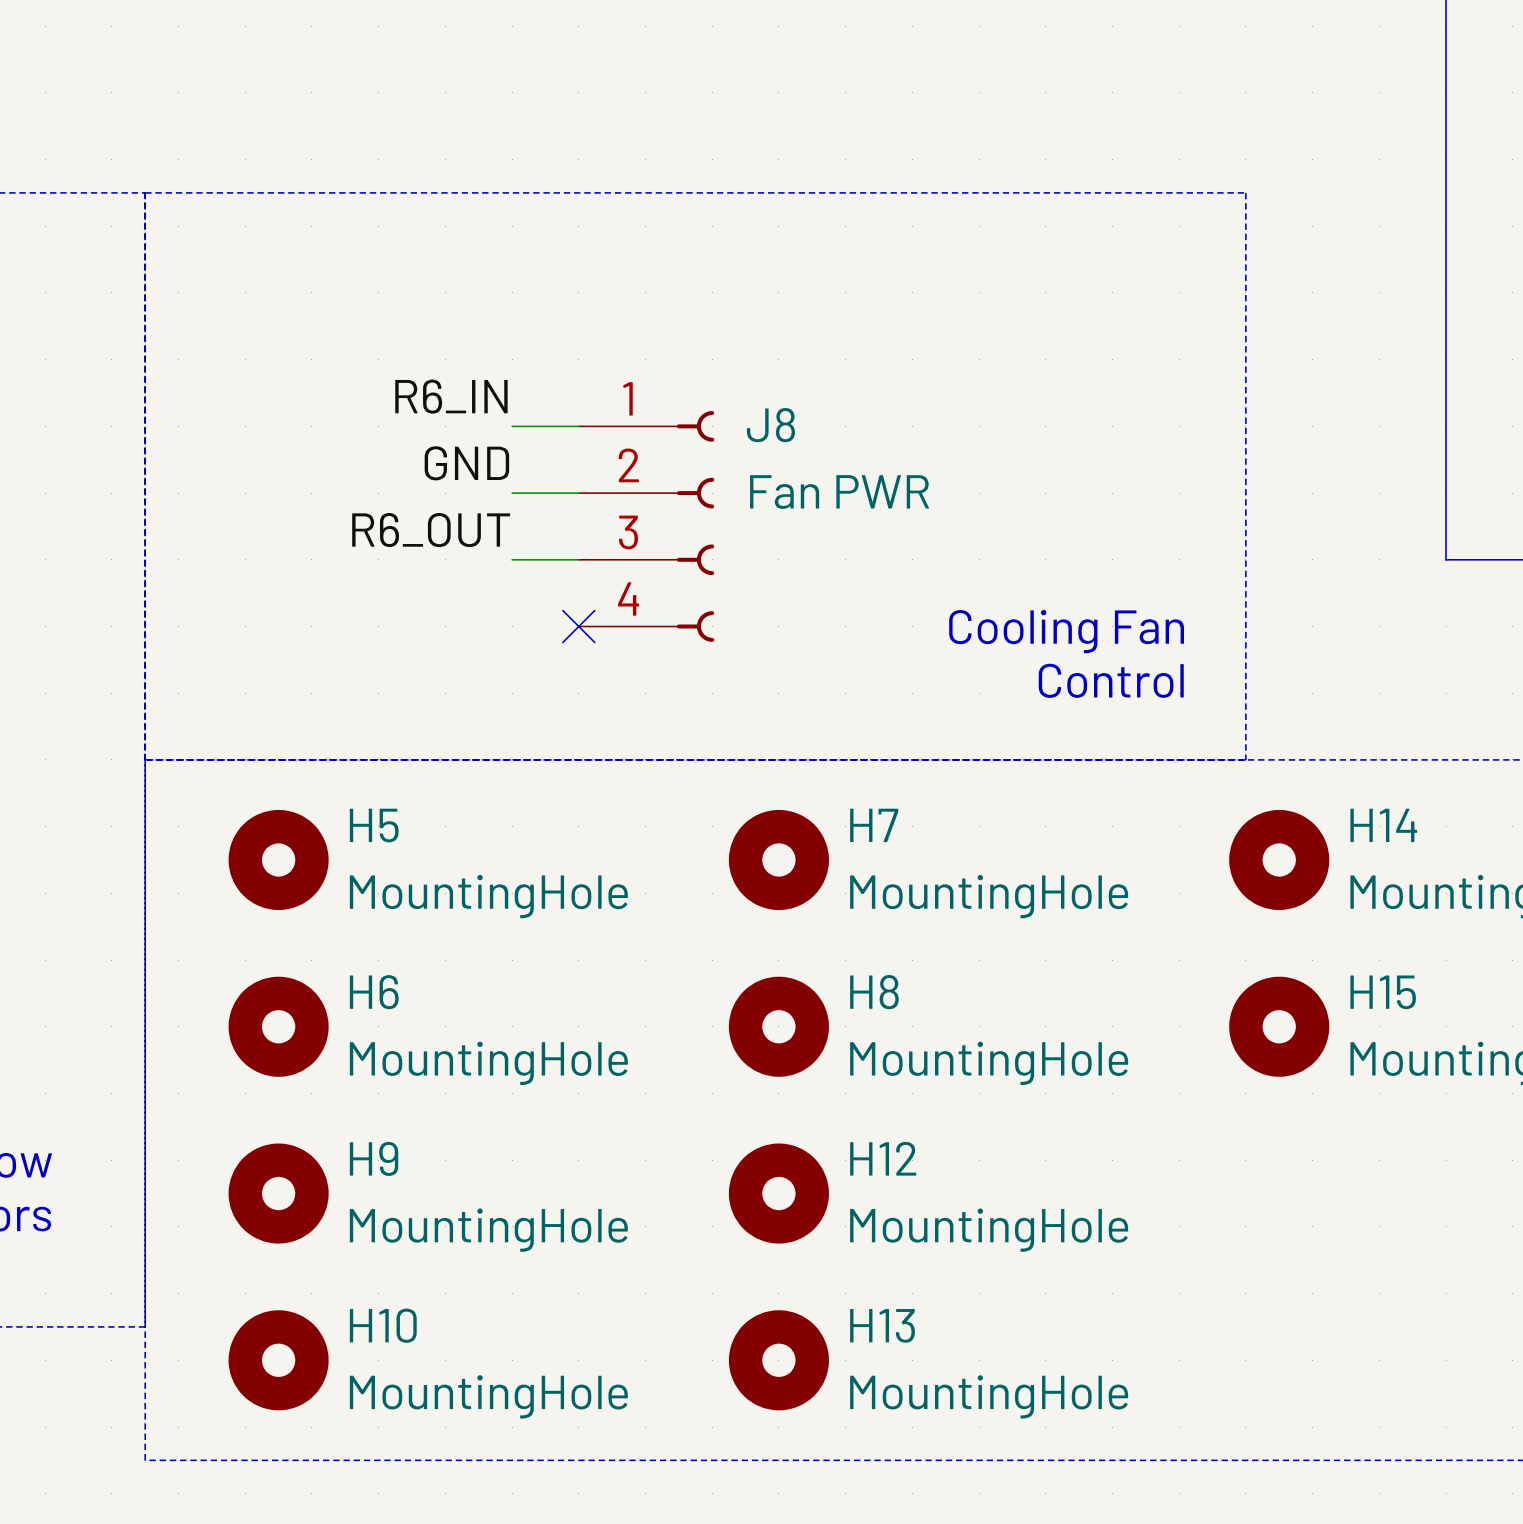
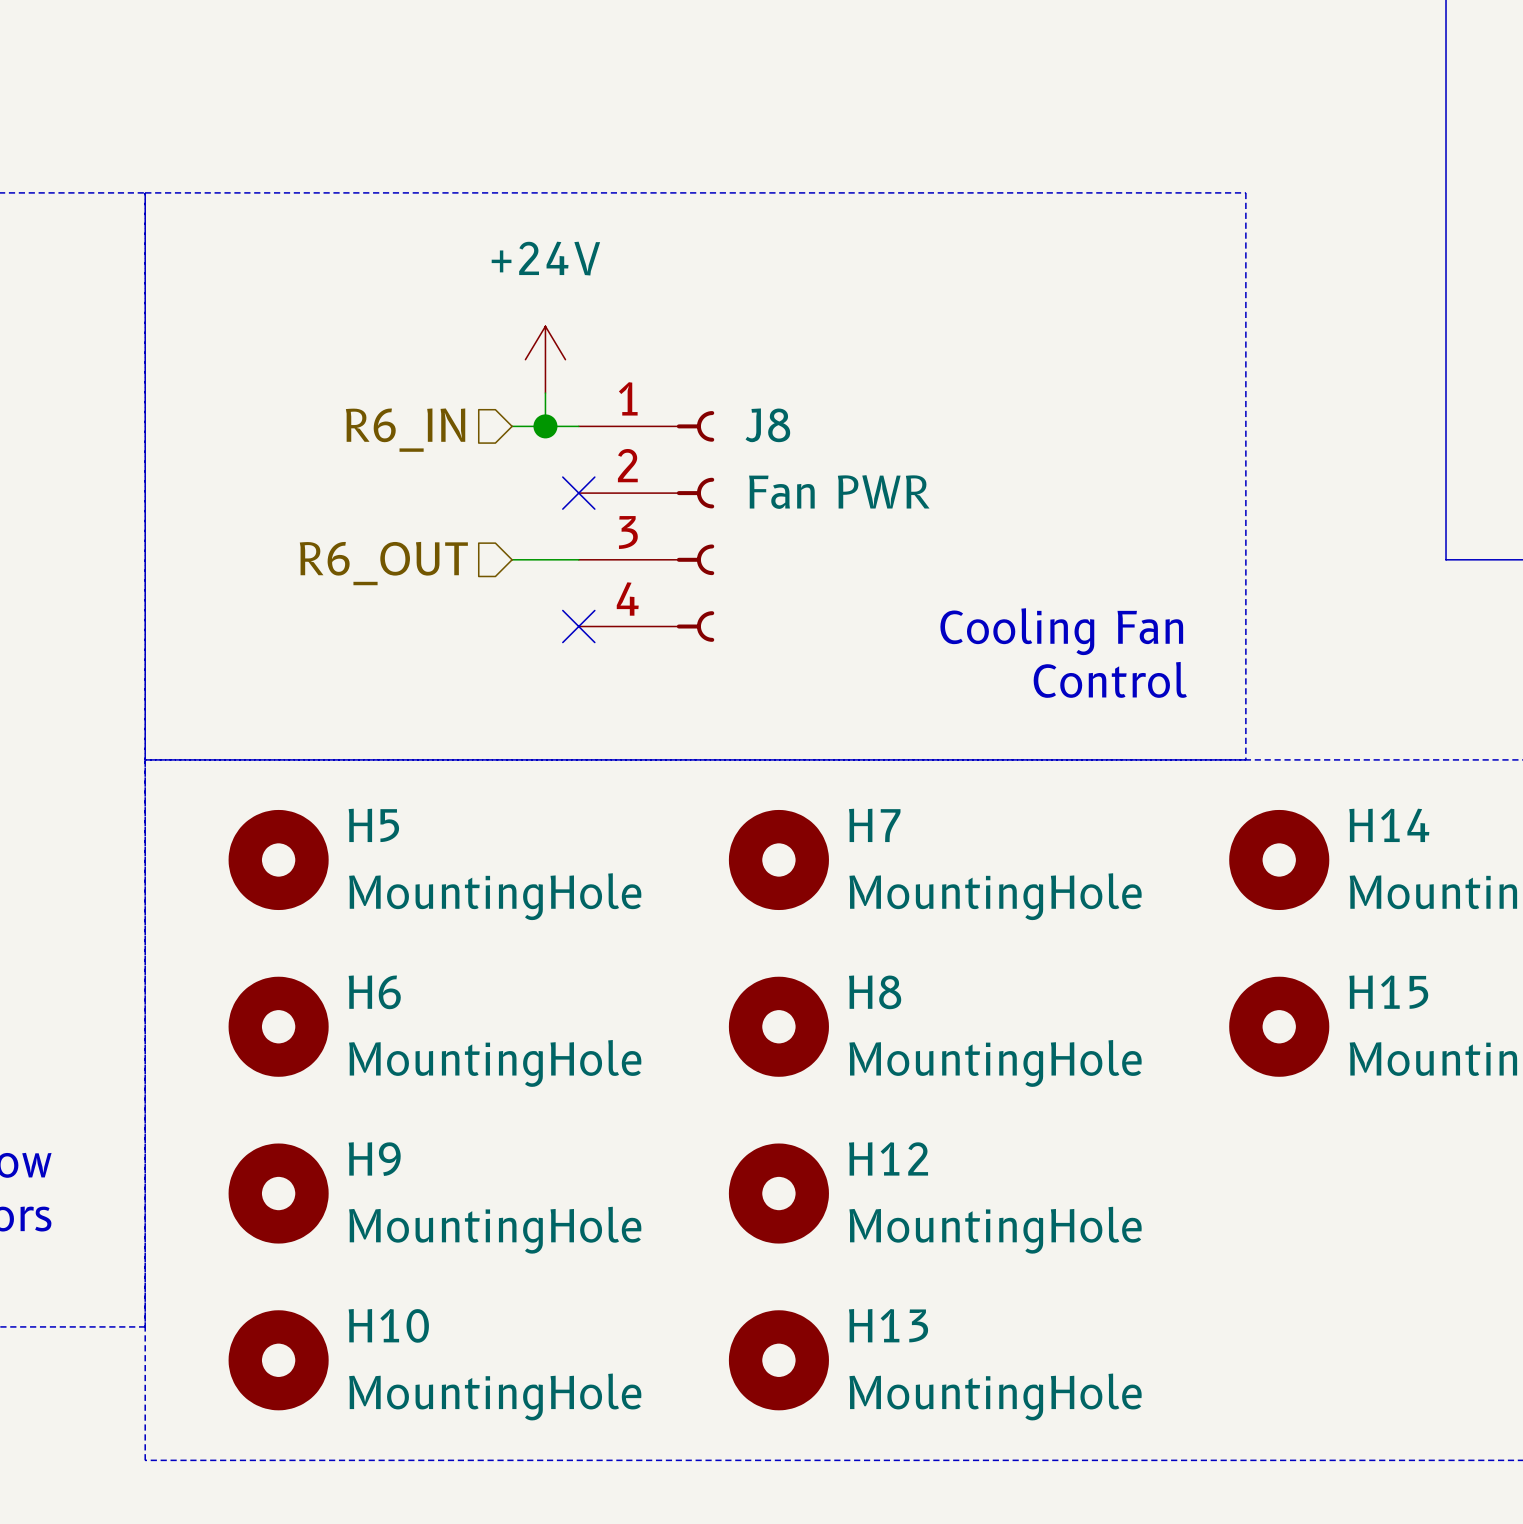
power symbol: none -> +24V (545, 359)
wire: none -> (545, 393) (545, 426)
label: R6_IN (451, 396) -> none
hierarchical label: none -> R6_IN (405, 430)
junction: none -> (545, 426)
label: GND (466, 463) -> none
wire: (512, 493) (578, 493) -> none
no-connect mark: none -> (578, 493)
label: R6_OUT (431, 530) -> none
hierarchical label: none -> R6_OUT (383, 563)

